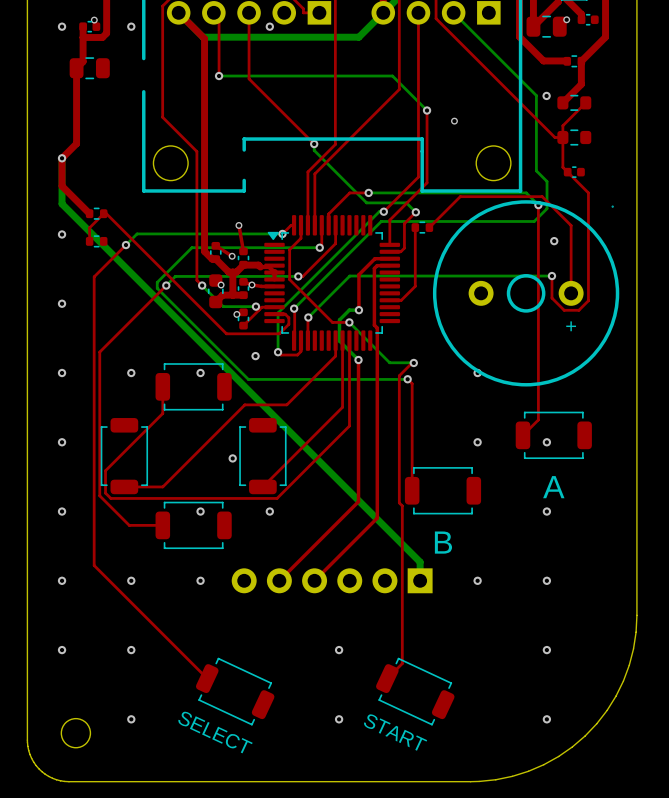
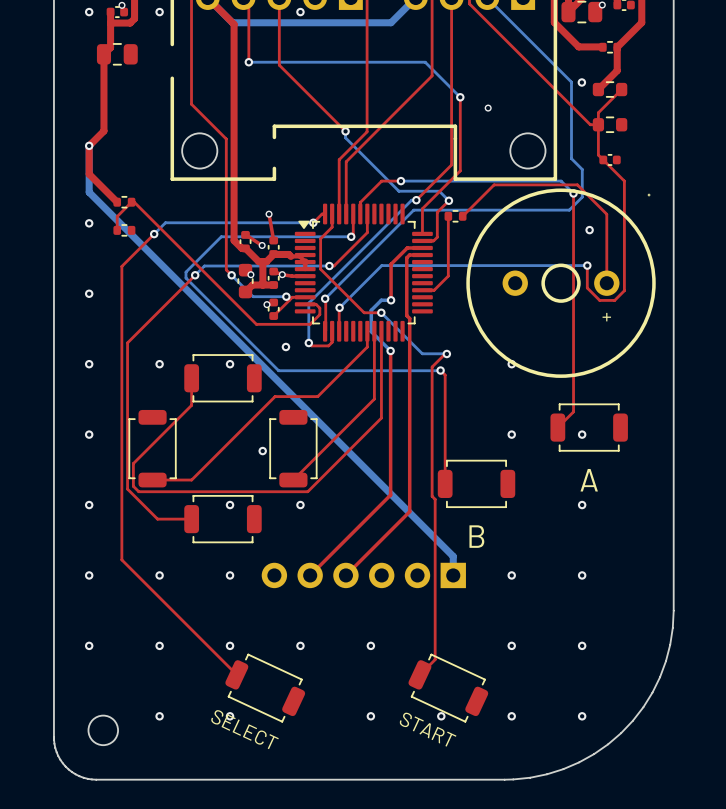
via: none -> (230, 645)
via: none -> (300, 645)
via: none -> (511, 645)
via: none -> (230, 716)
via: none -> (441, 716)
via: none -> (511, 716)

